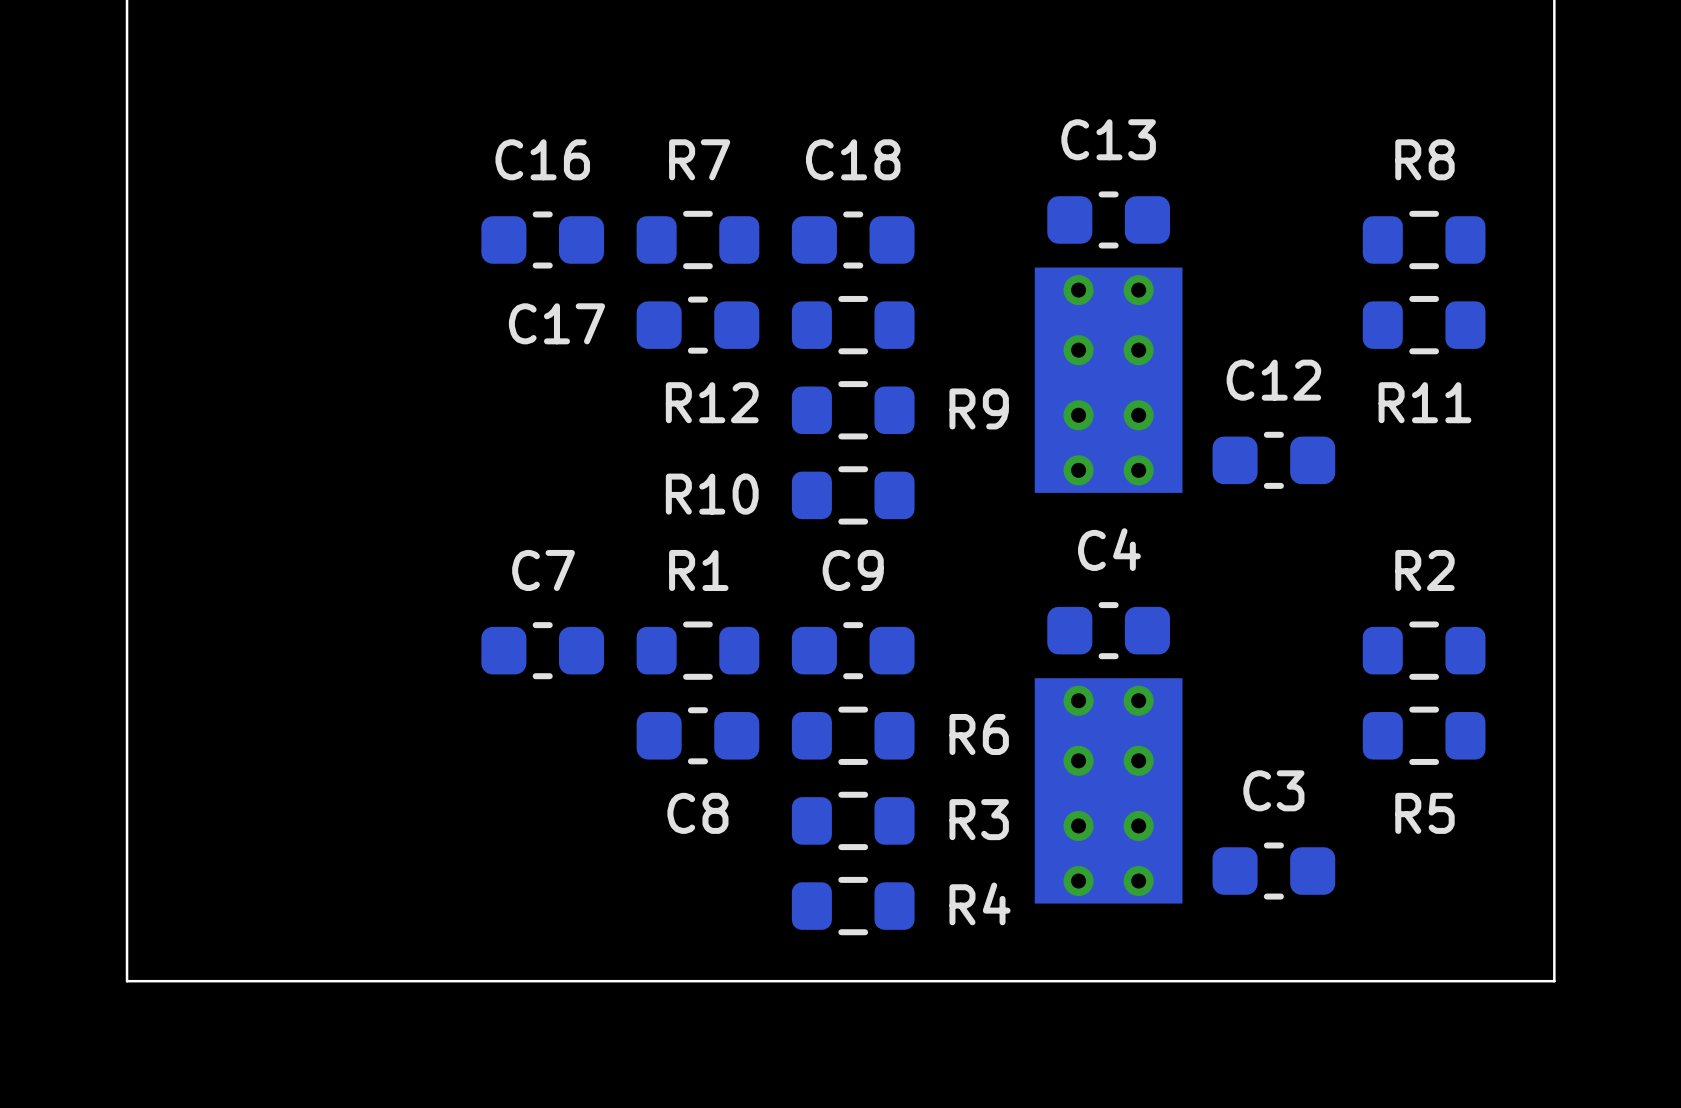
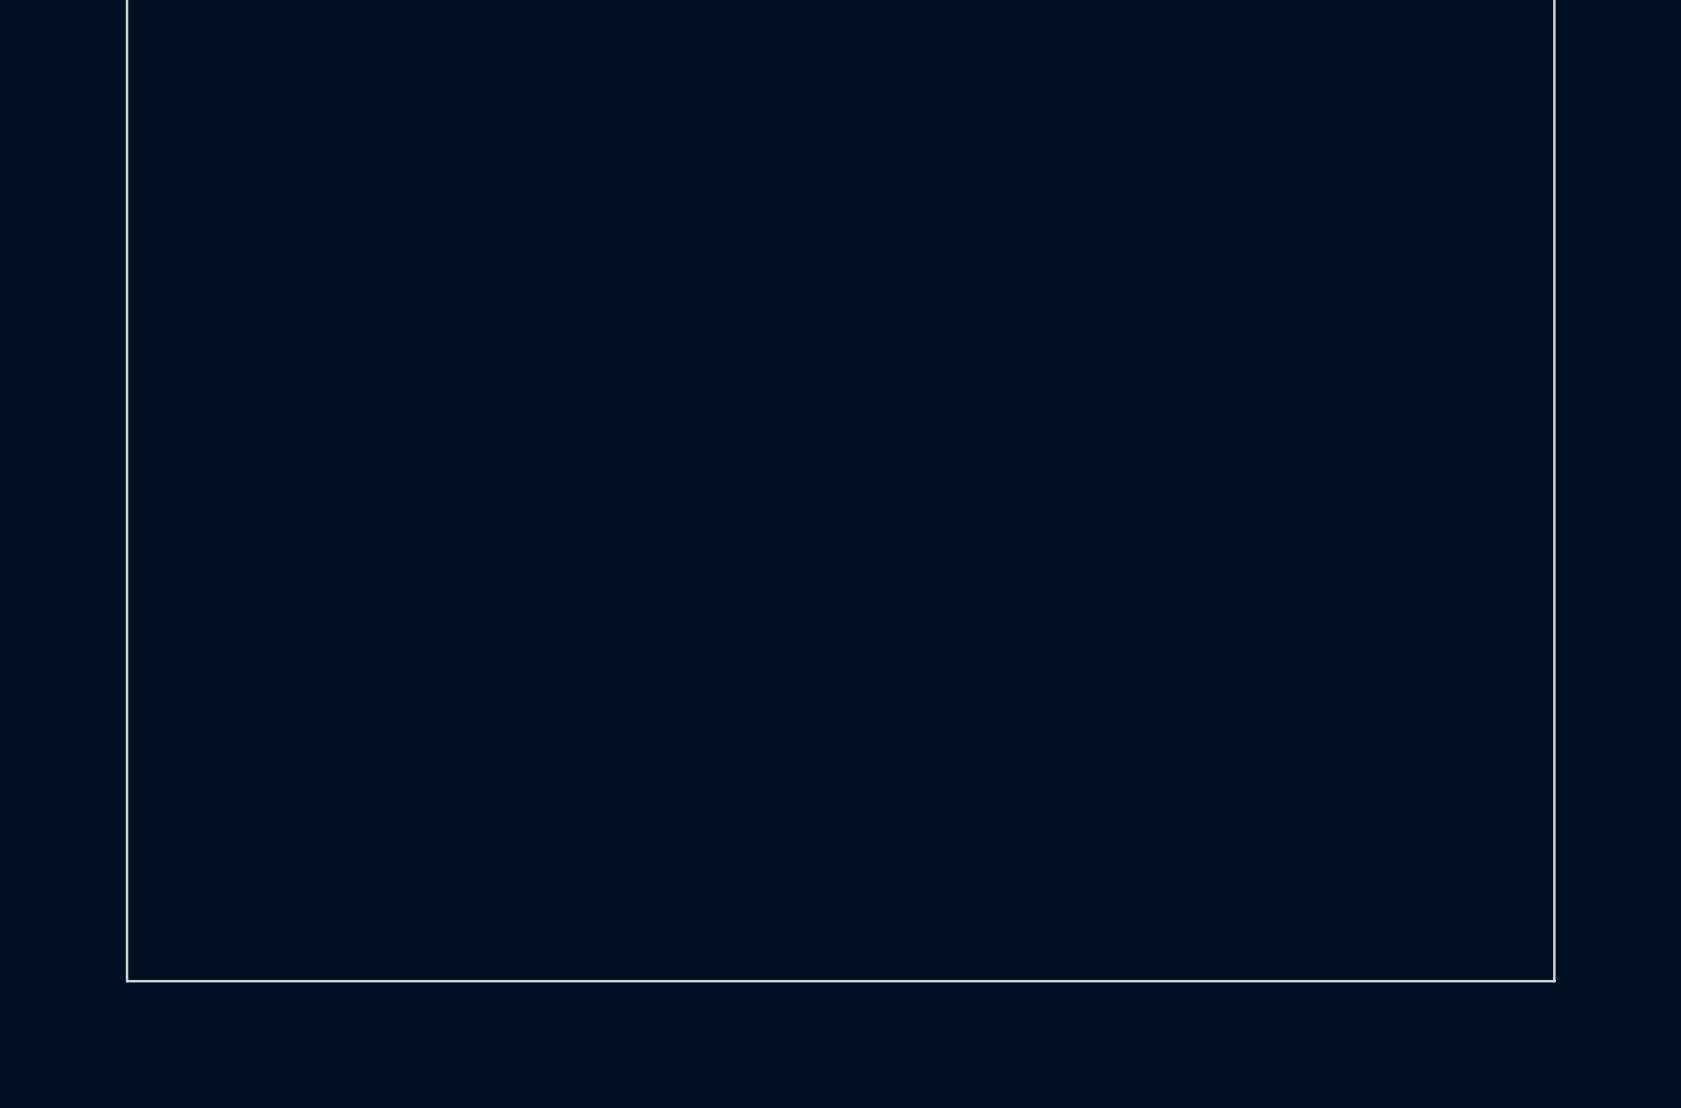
C13: (1108, 219) -> none
C16: (542, 239) -> none
R7: (697, 239) -> none
C18: (853, 239) -> none
R8: (1424, 239) -> none
C17: (697, 325) -> none
R12: (853, 325) -> none
R11: (1424, 325) -> none
part: (1108, 380) -> none
R9: (853, 410) -> none
C12: (1273, 460) -> none
R10: (853, 495) -> none
C4: (1108, 630) -> none
C7: (542, 650) -> none
R1: (697, 650) -> none
C9: (853, 650) -> none
R2: (1424, 650) -> none
C8: (697, 735) -> none
R6: (853, 735) -> none
R5: (1424, 735) -> none
part: (1108, 790) -> none
R3: (853, 820) -> none
C3: (1273, 871) -> none
R4: (853, 906) -> none

